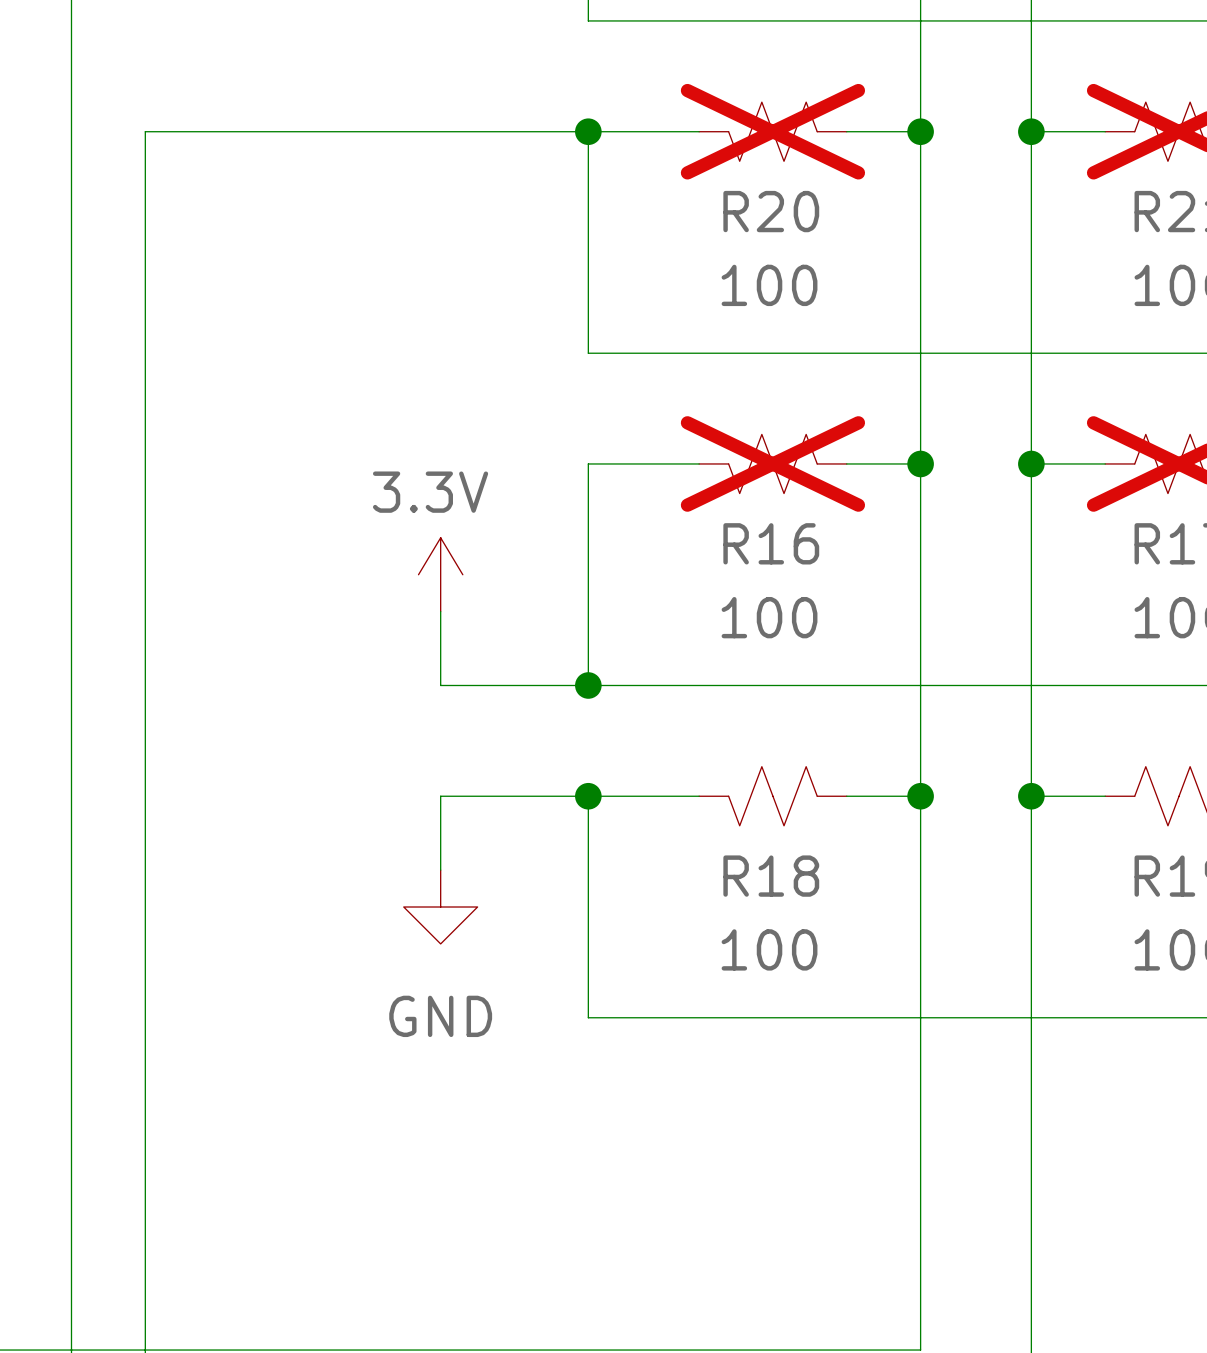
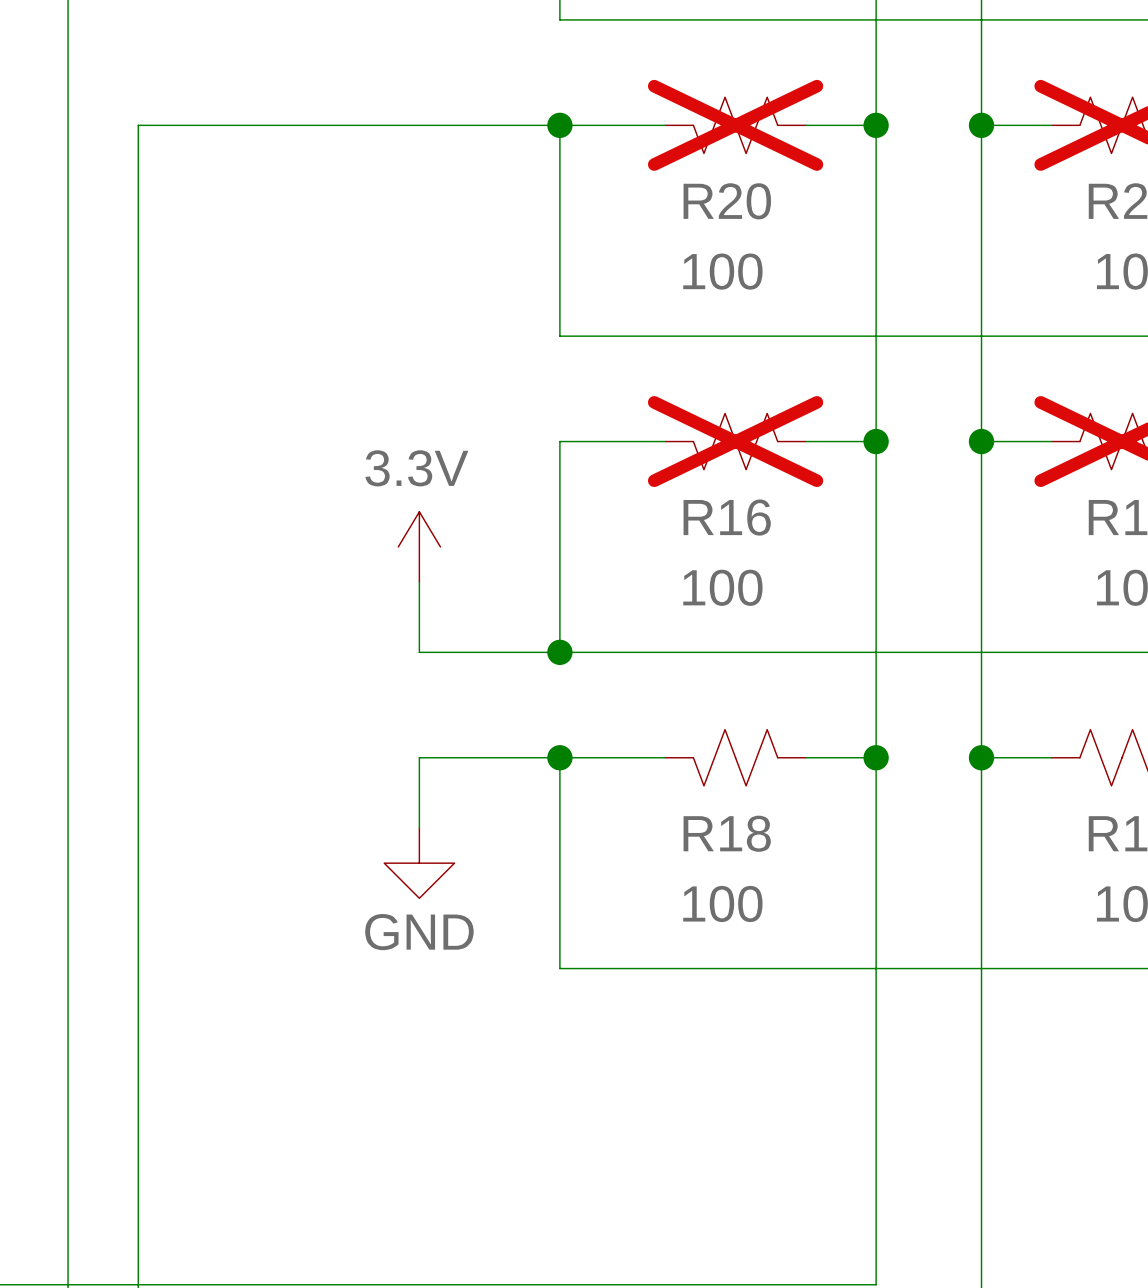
power symbol text position: GND (440, 1016) -> GND (419, 932)

